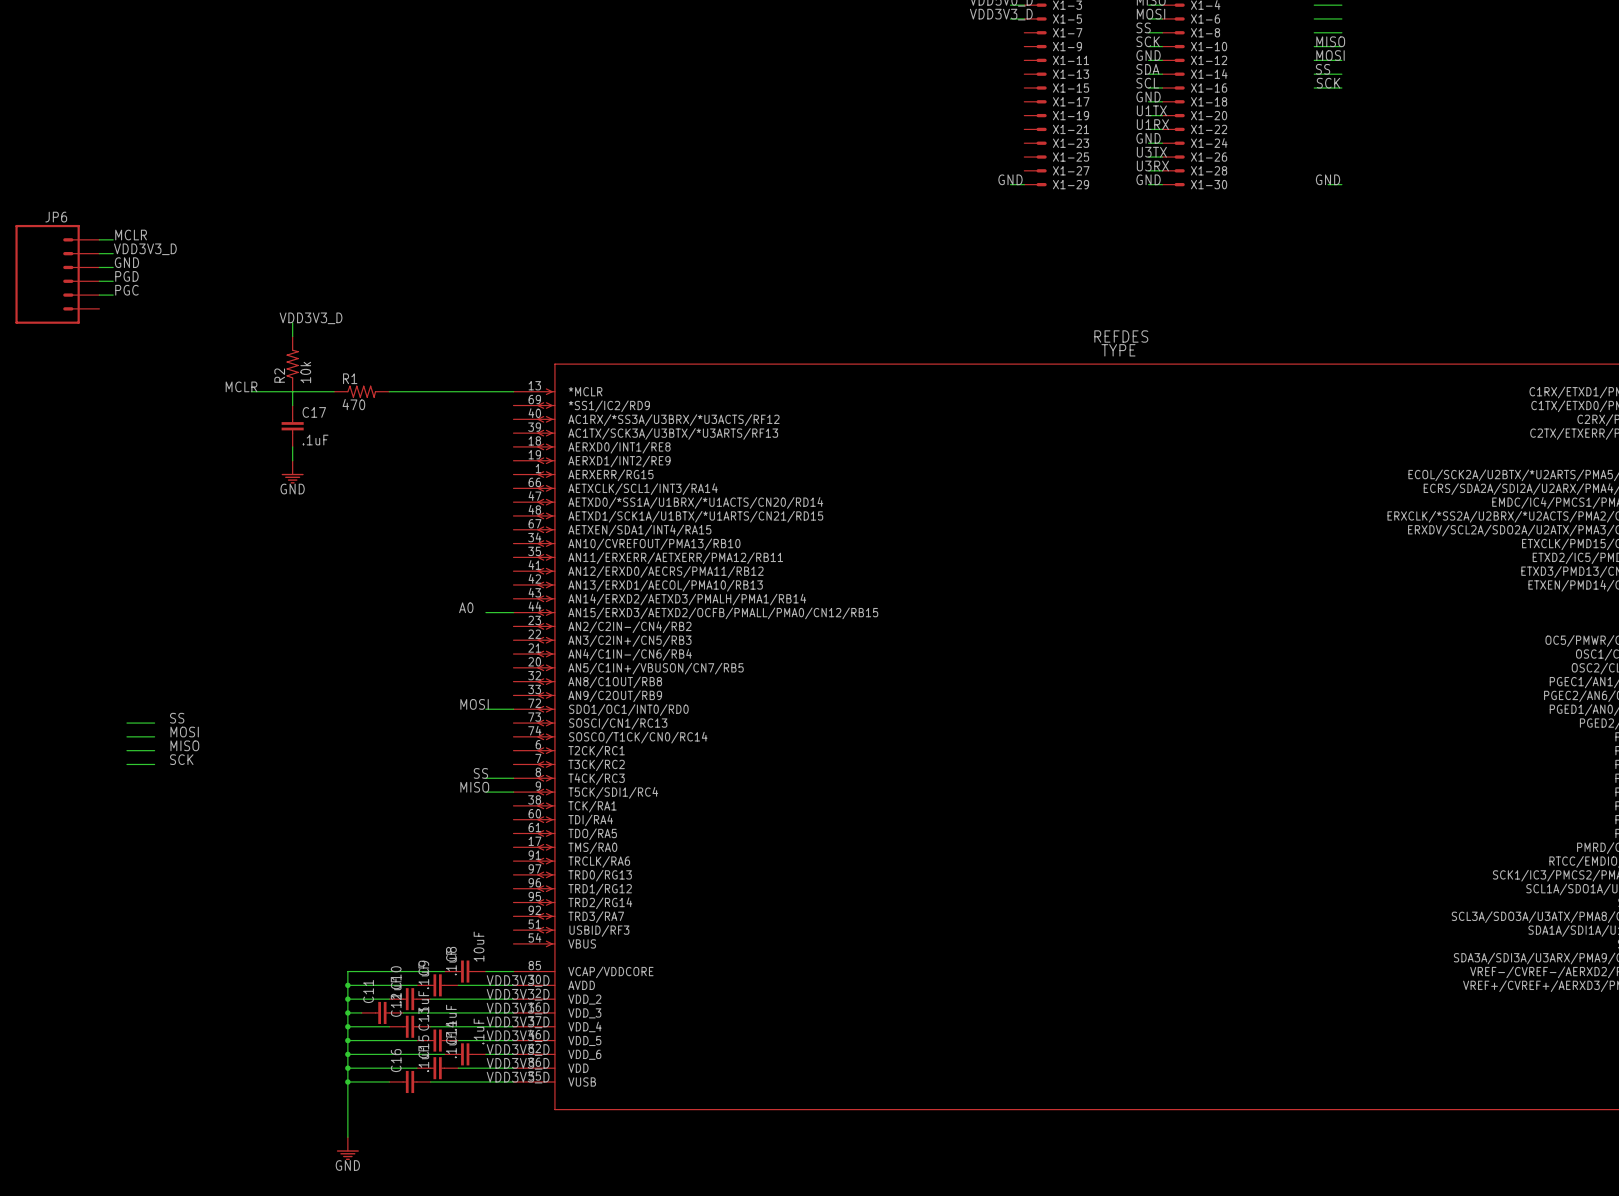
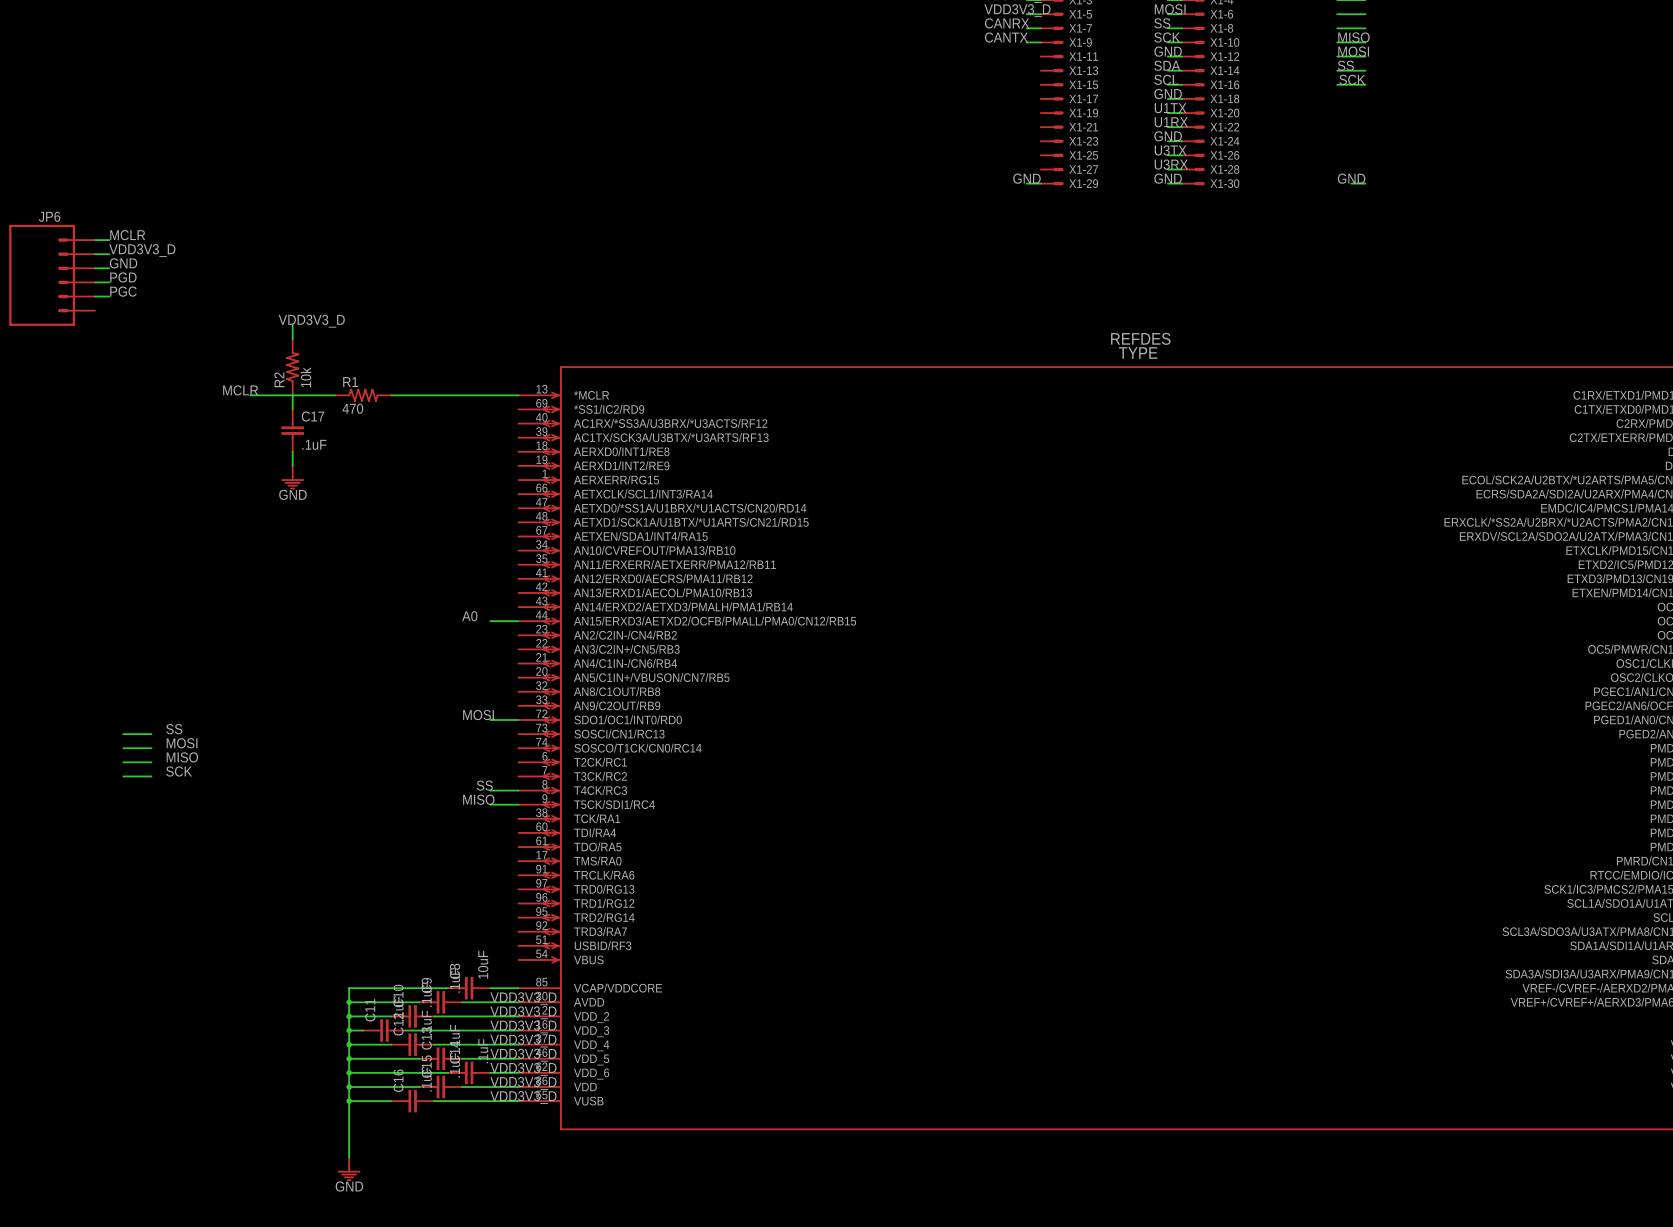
label: none -> CANRX (1007, 23)
wire: none -> (1026, 28) (1040, 28)
label: none -> CANTX (1006, 37)
wire: none -> (1026, 42) (1040, 42)

